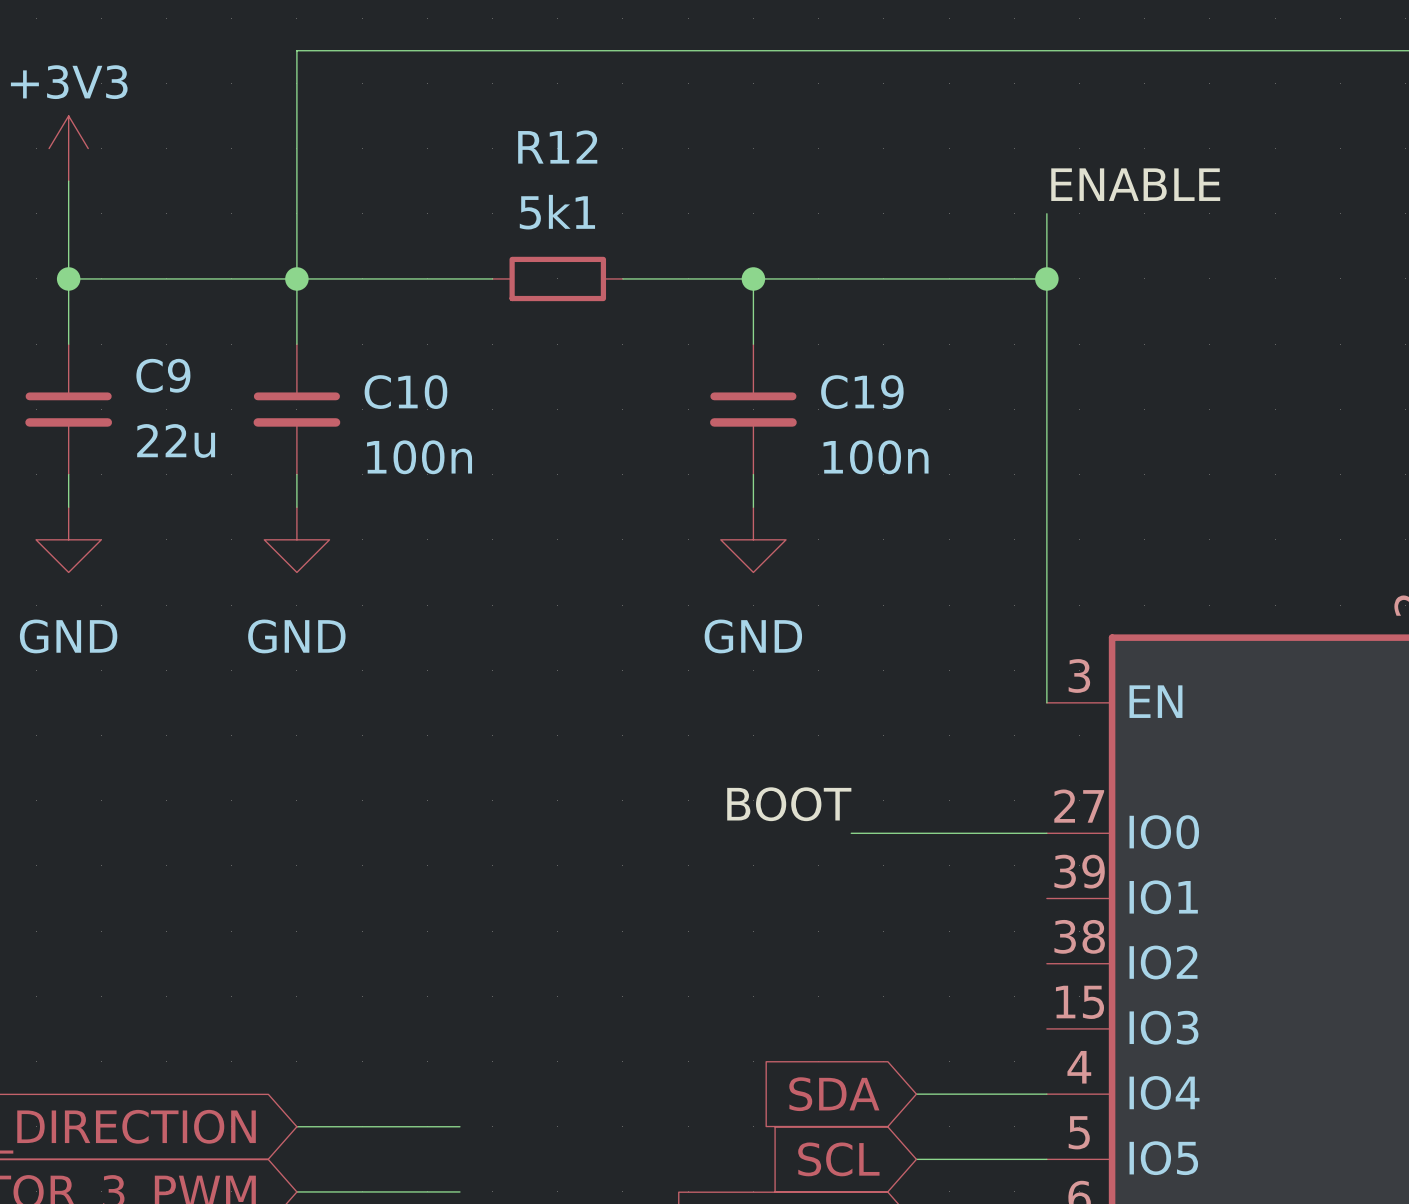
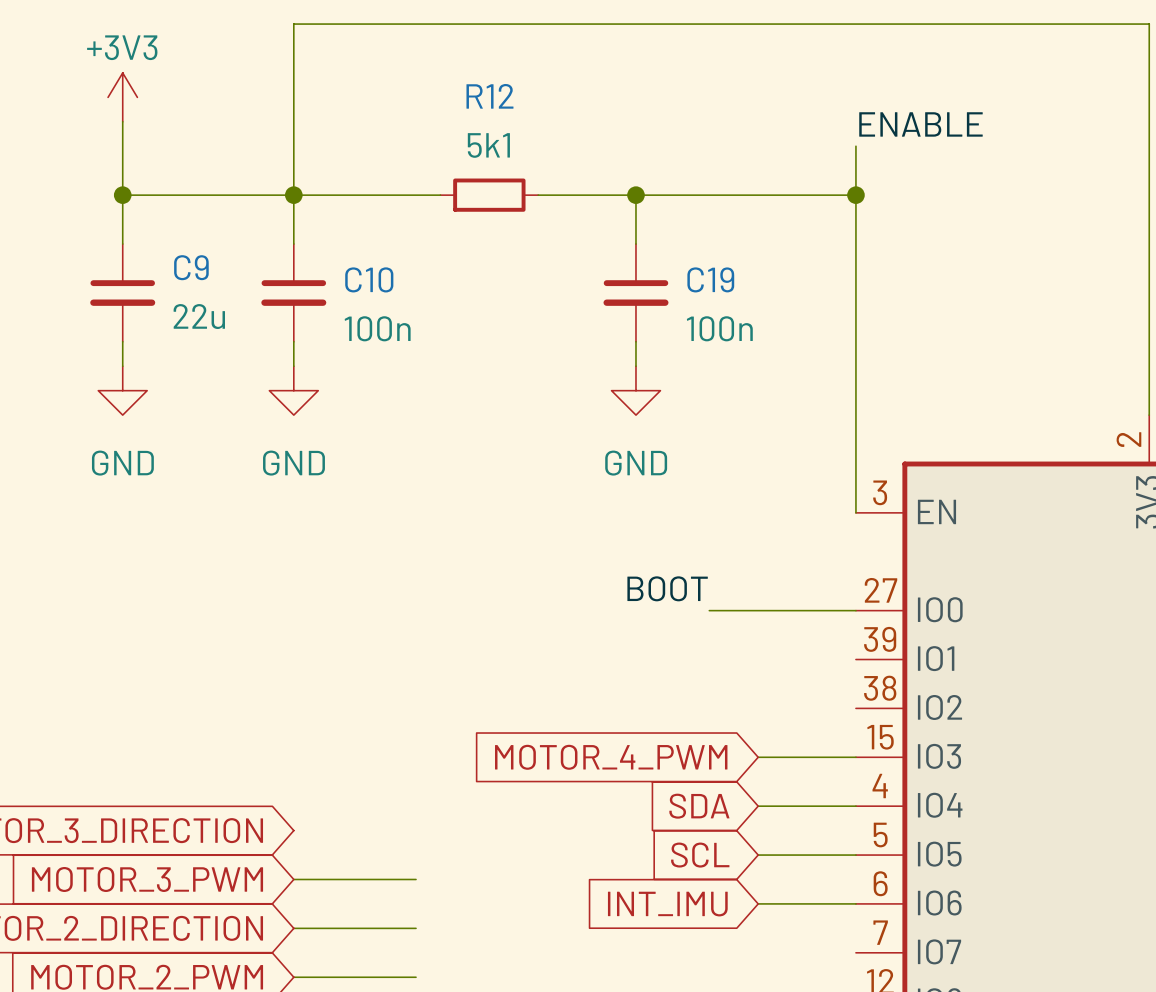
wire: none -> (758, 757) (855, 757)
global label: none -> MOTOR_4_PWM (611, 757)
wire: (296, 1126) (459, 1126) -> none

